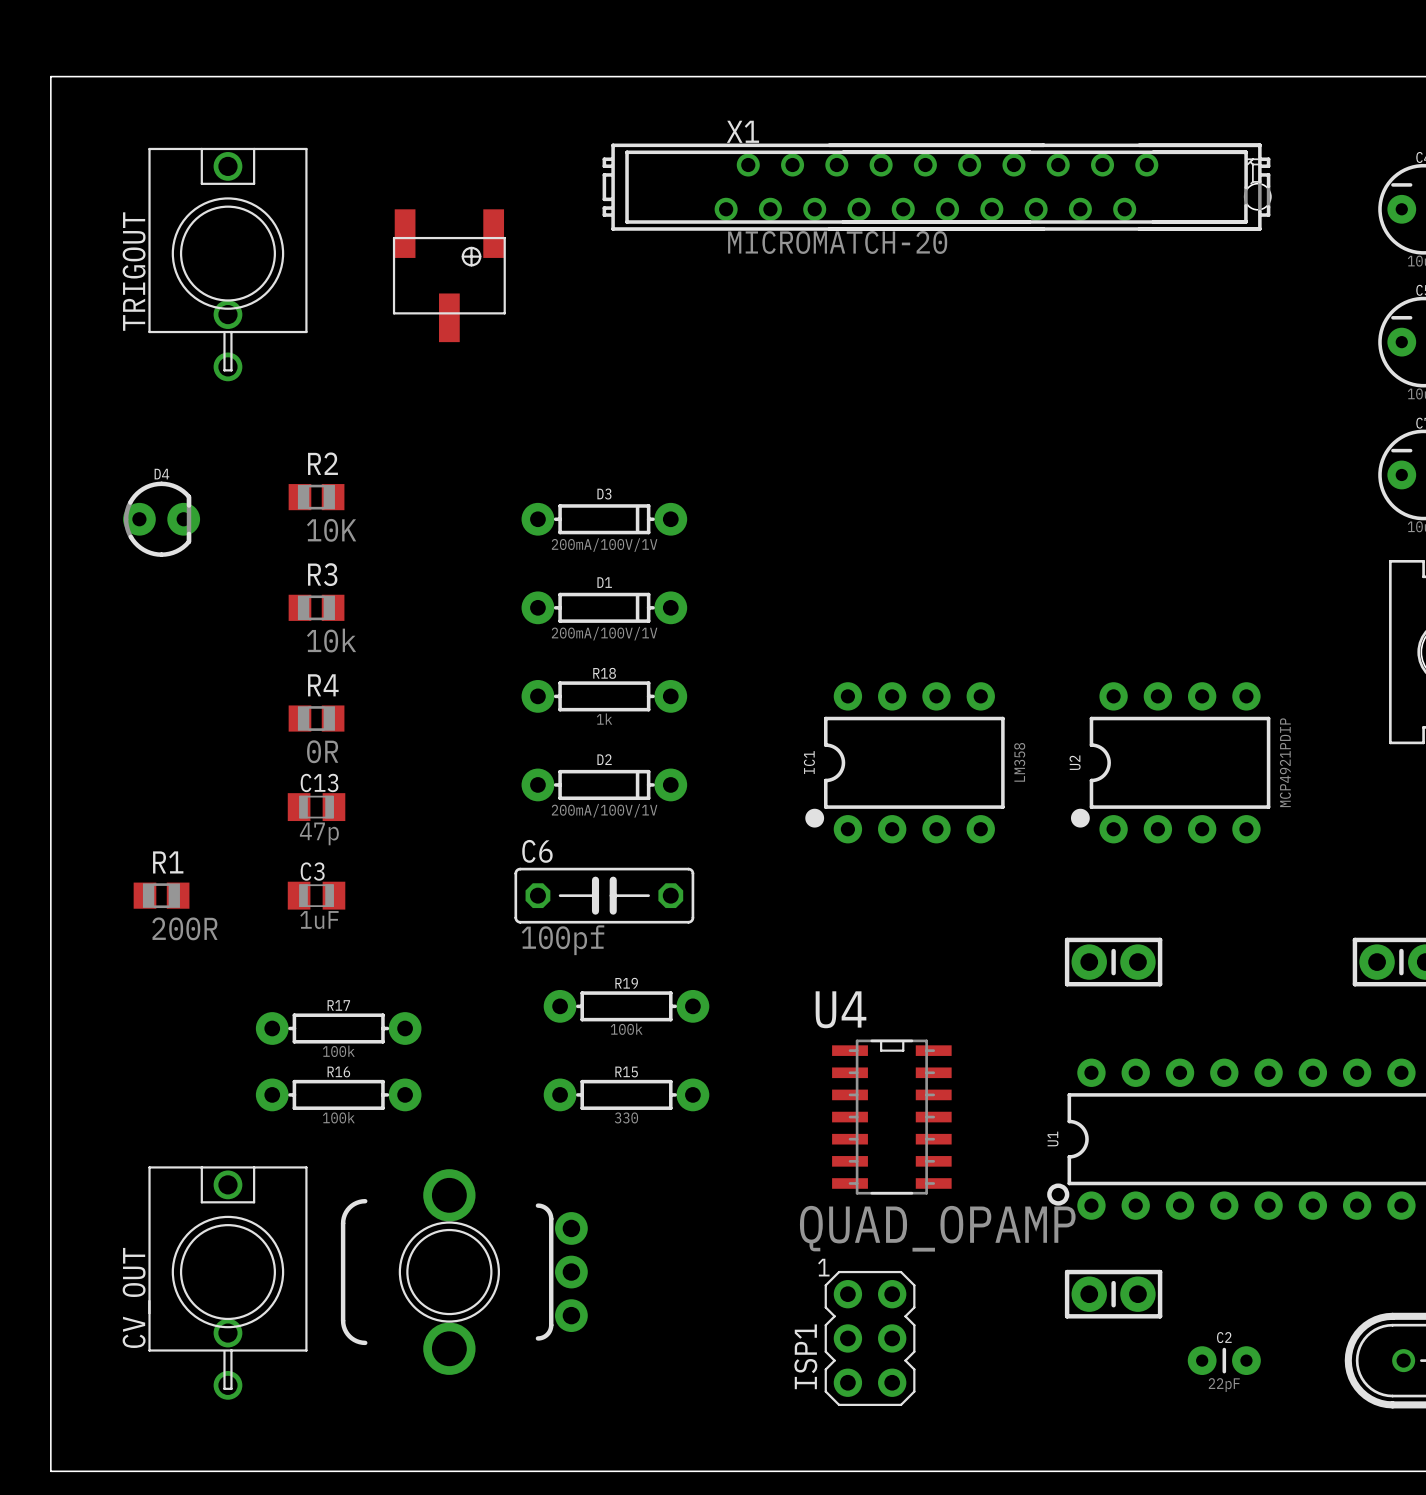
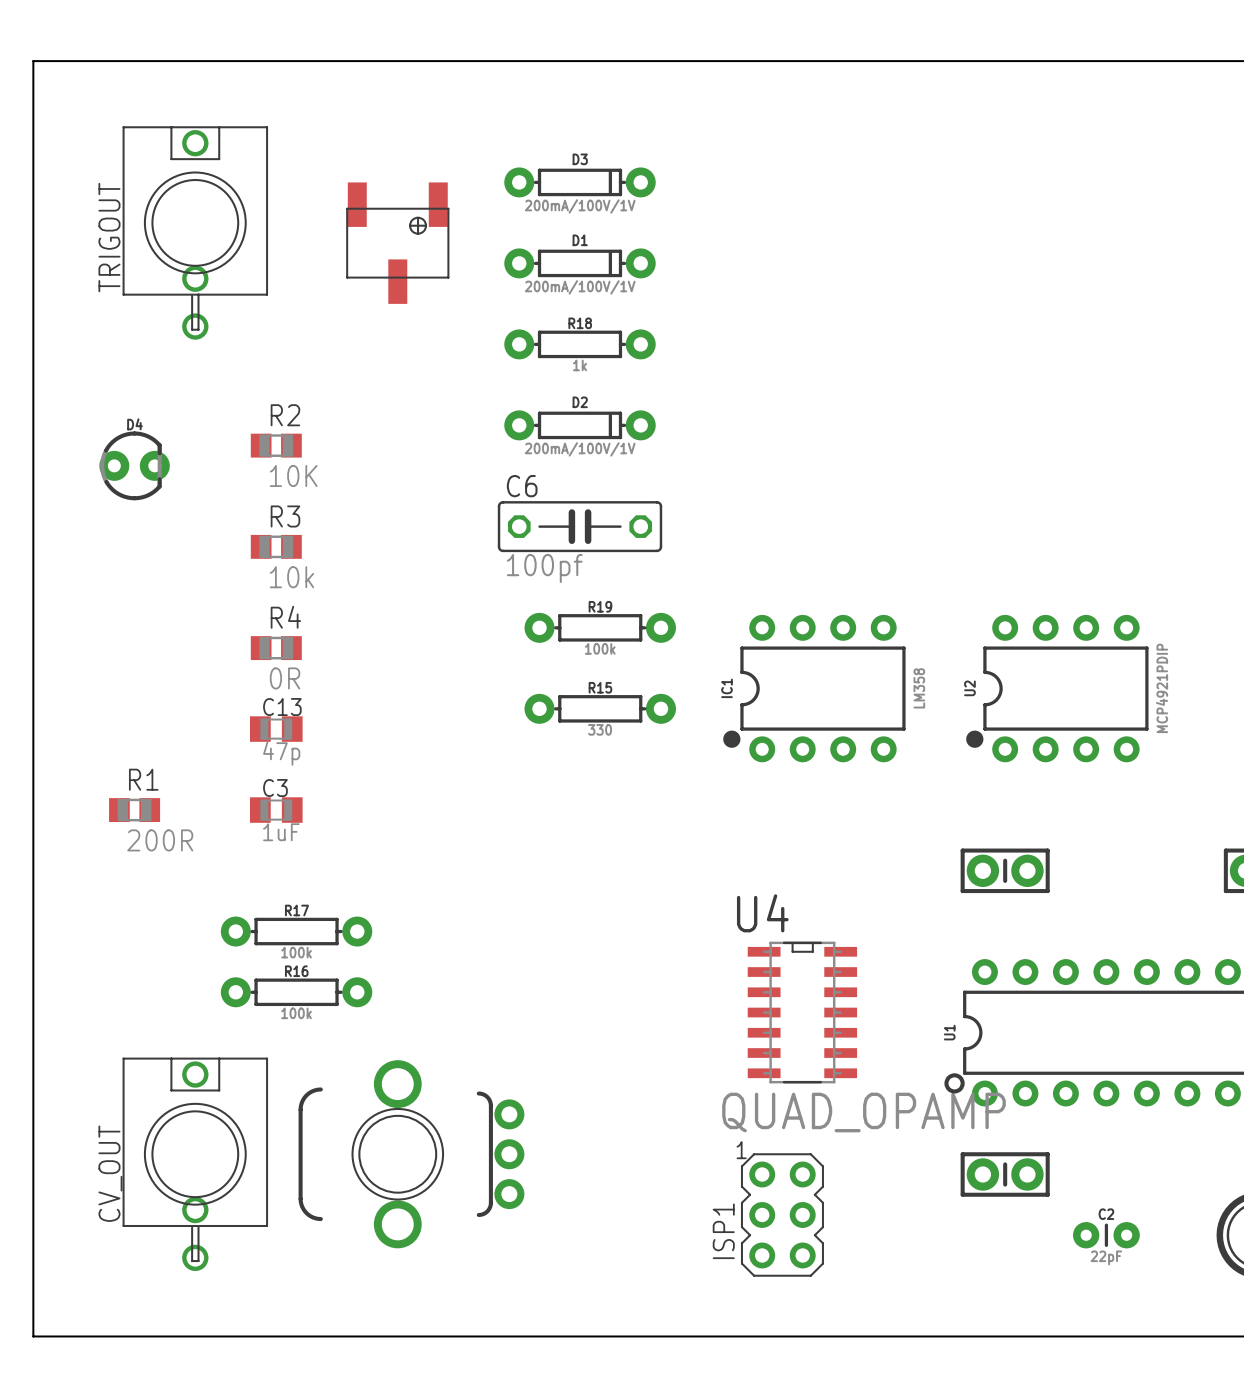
X1: MICROMATCH-20 (936, 187) -> none
D3 position: (604, 519) -> (580, 182)
D1 position: (604, 607) -> (580, 263)
R18 position: (604, 696) -> (580, 344)
D2 position: (604, 784) -> (580, 425)
C6 position: (604, 895) -> (580, 526)
R19 position: (626, 1006) -> (600, 627)
R15 position: (626, 1094) -> (600, 708)

